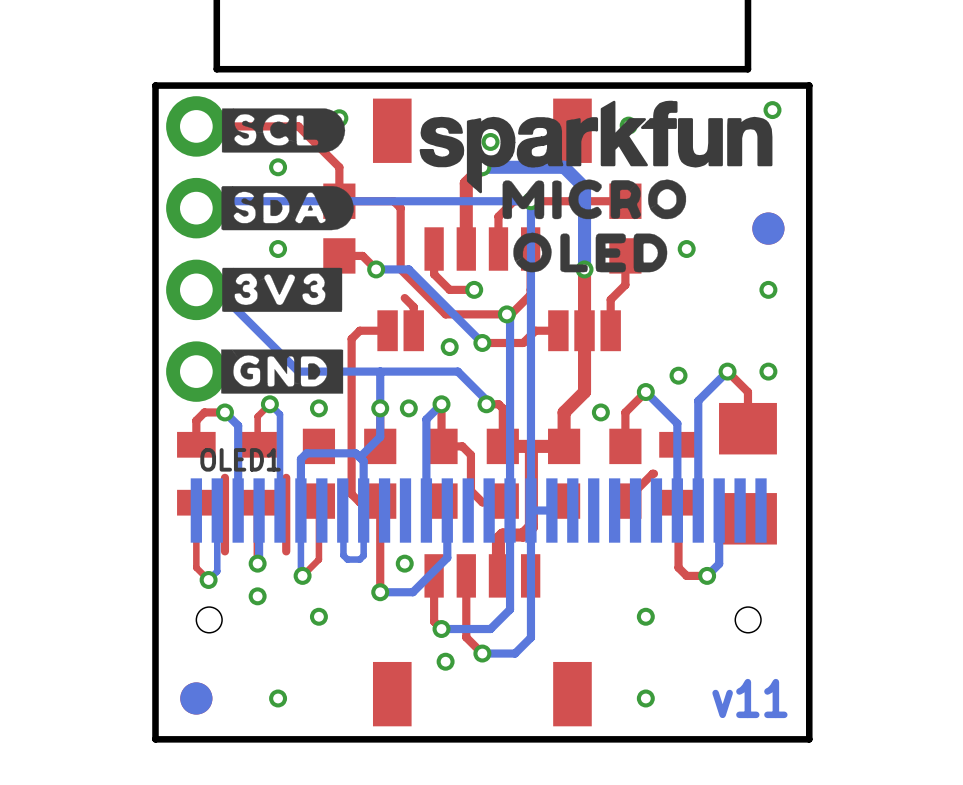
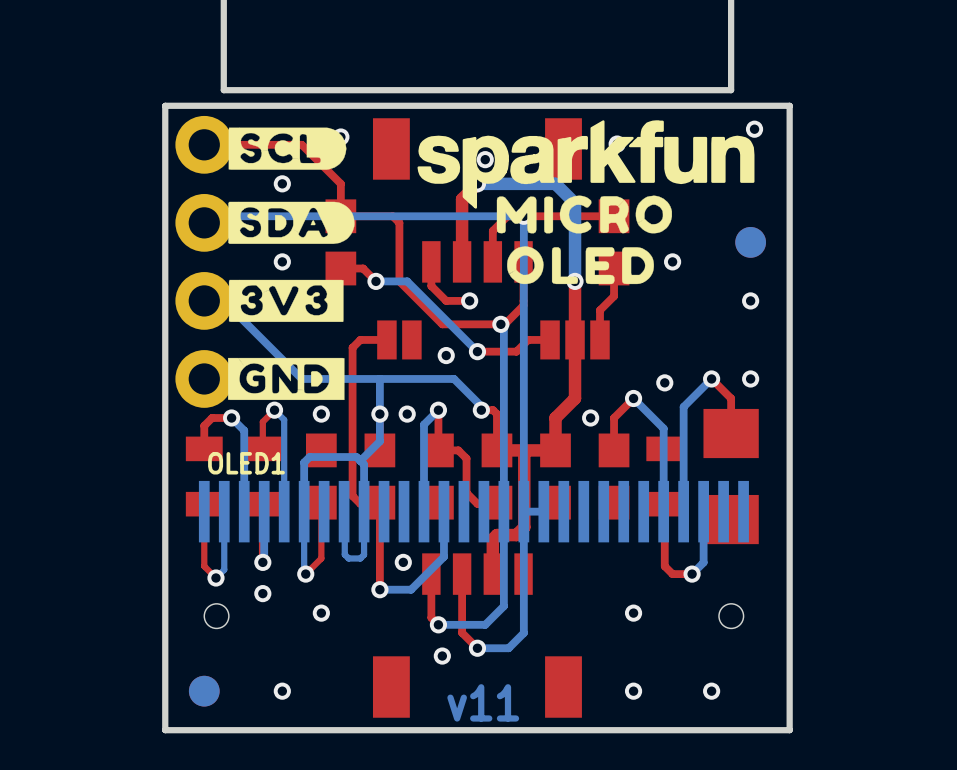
top track: (404, 298) (413, 307) (413, 330) -> none
top track: (654, 473) (625, 501) -> none
top track: (224, 477) (224, 551) -> none
top track: (286, 477) (286, 551) -> none
via: none -> (711, 691)
text position: v11 (749, 698) -> v11 (483, 702)

